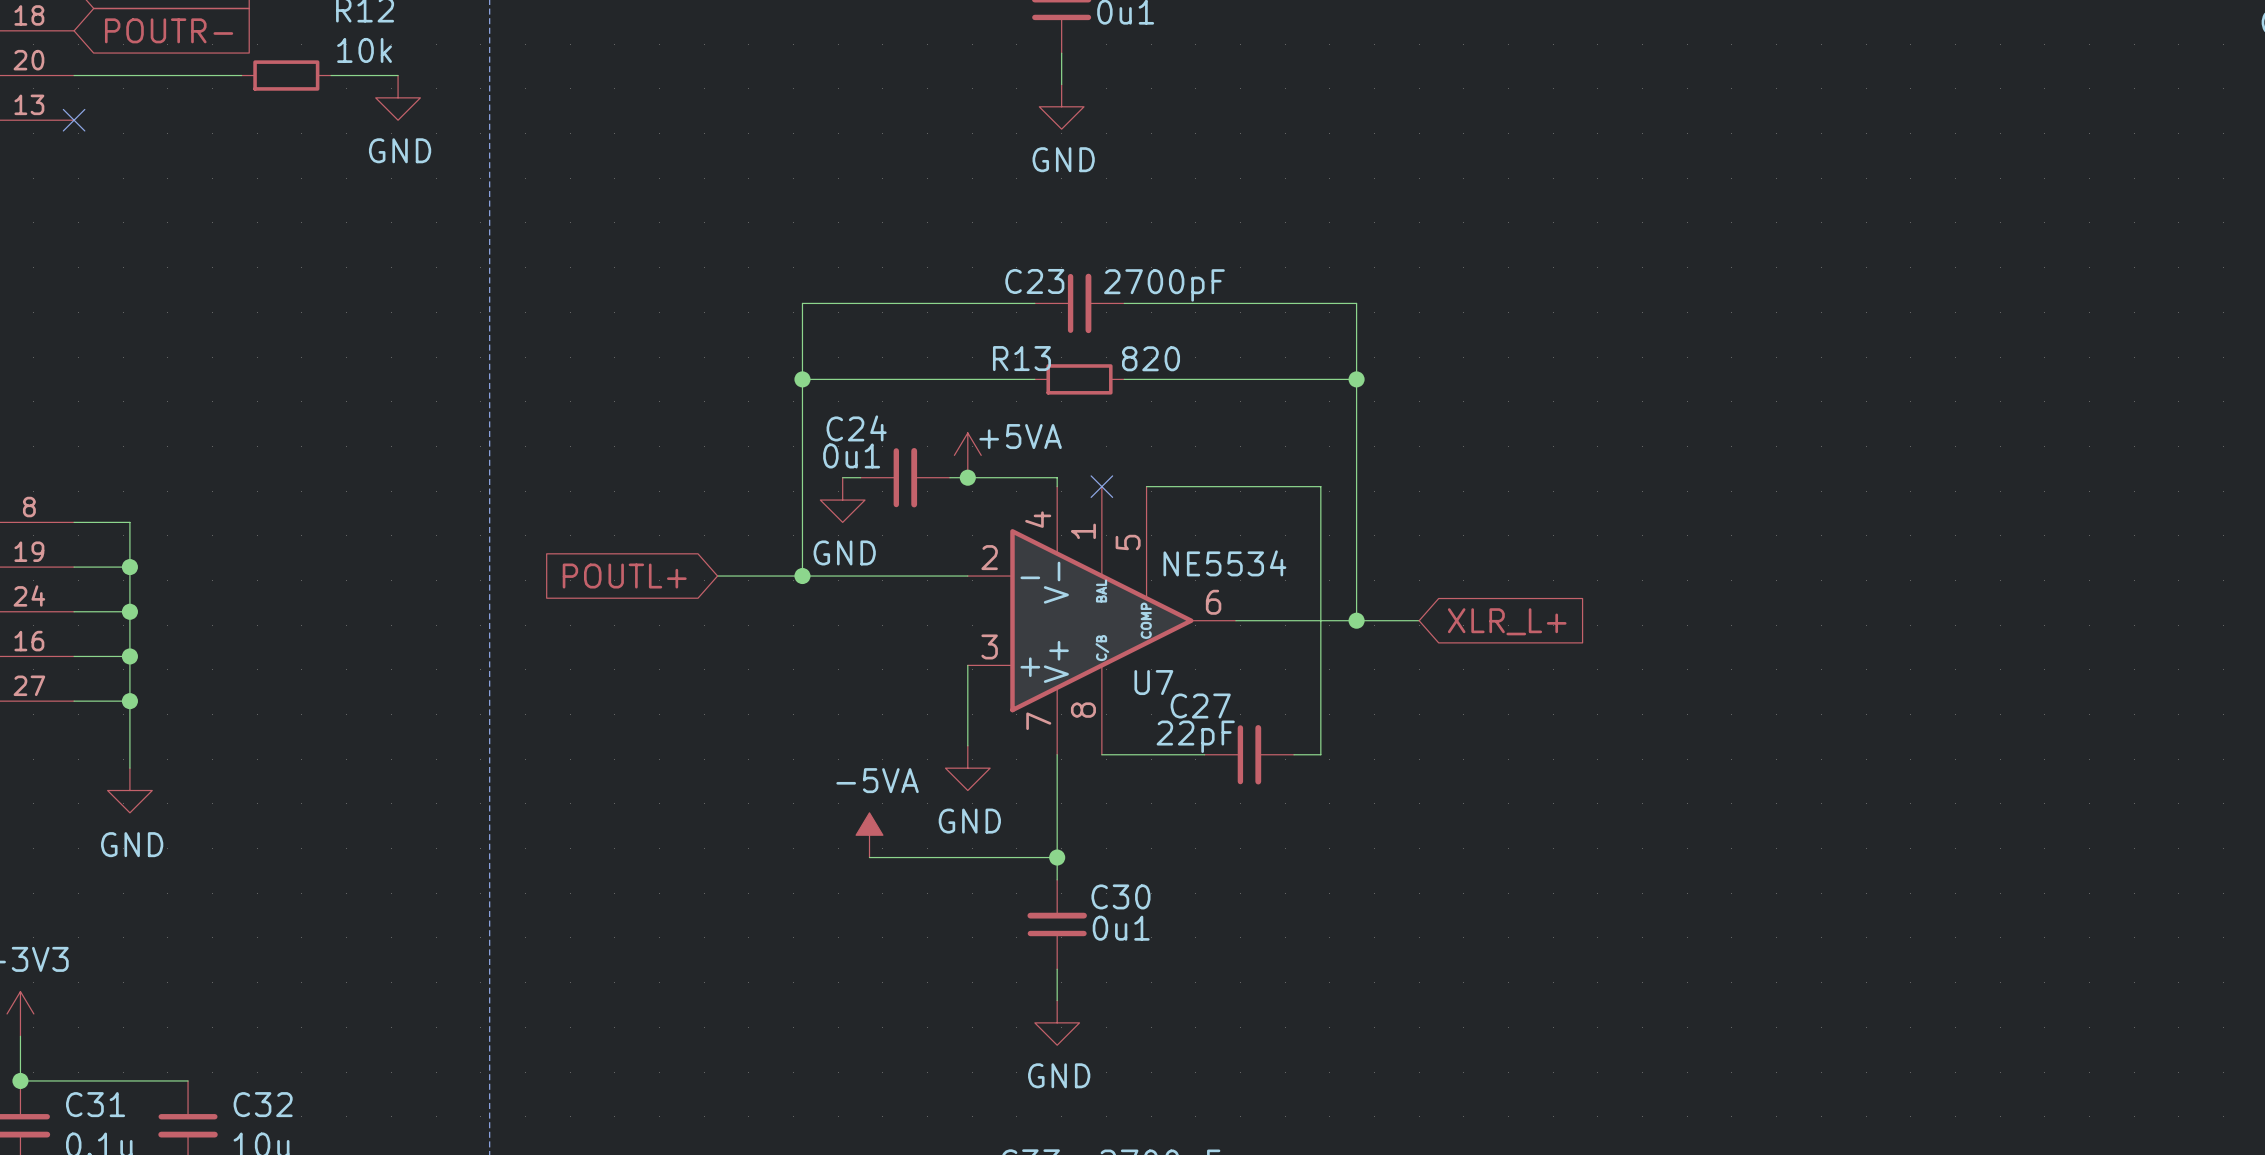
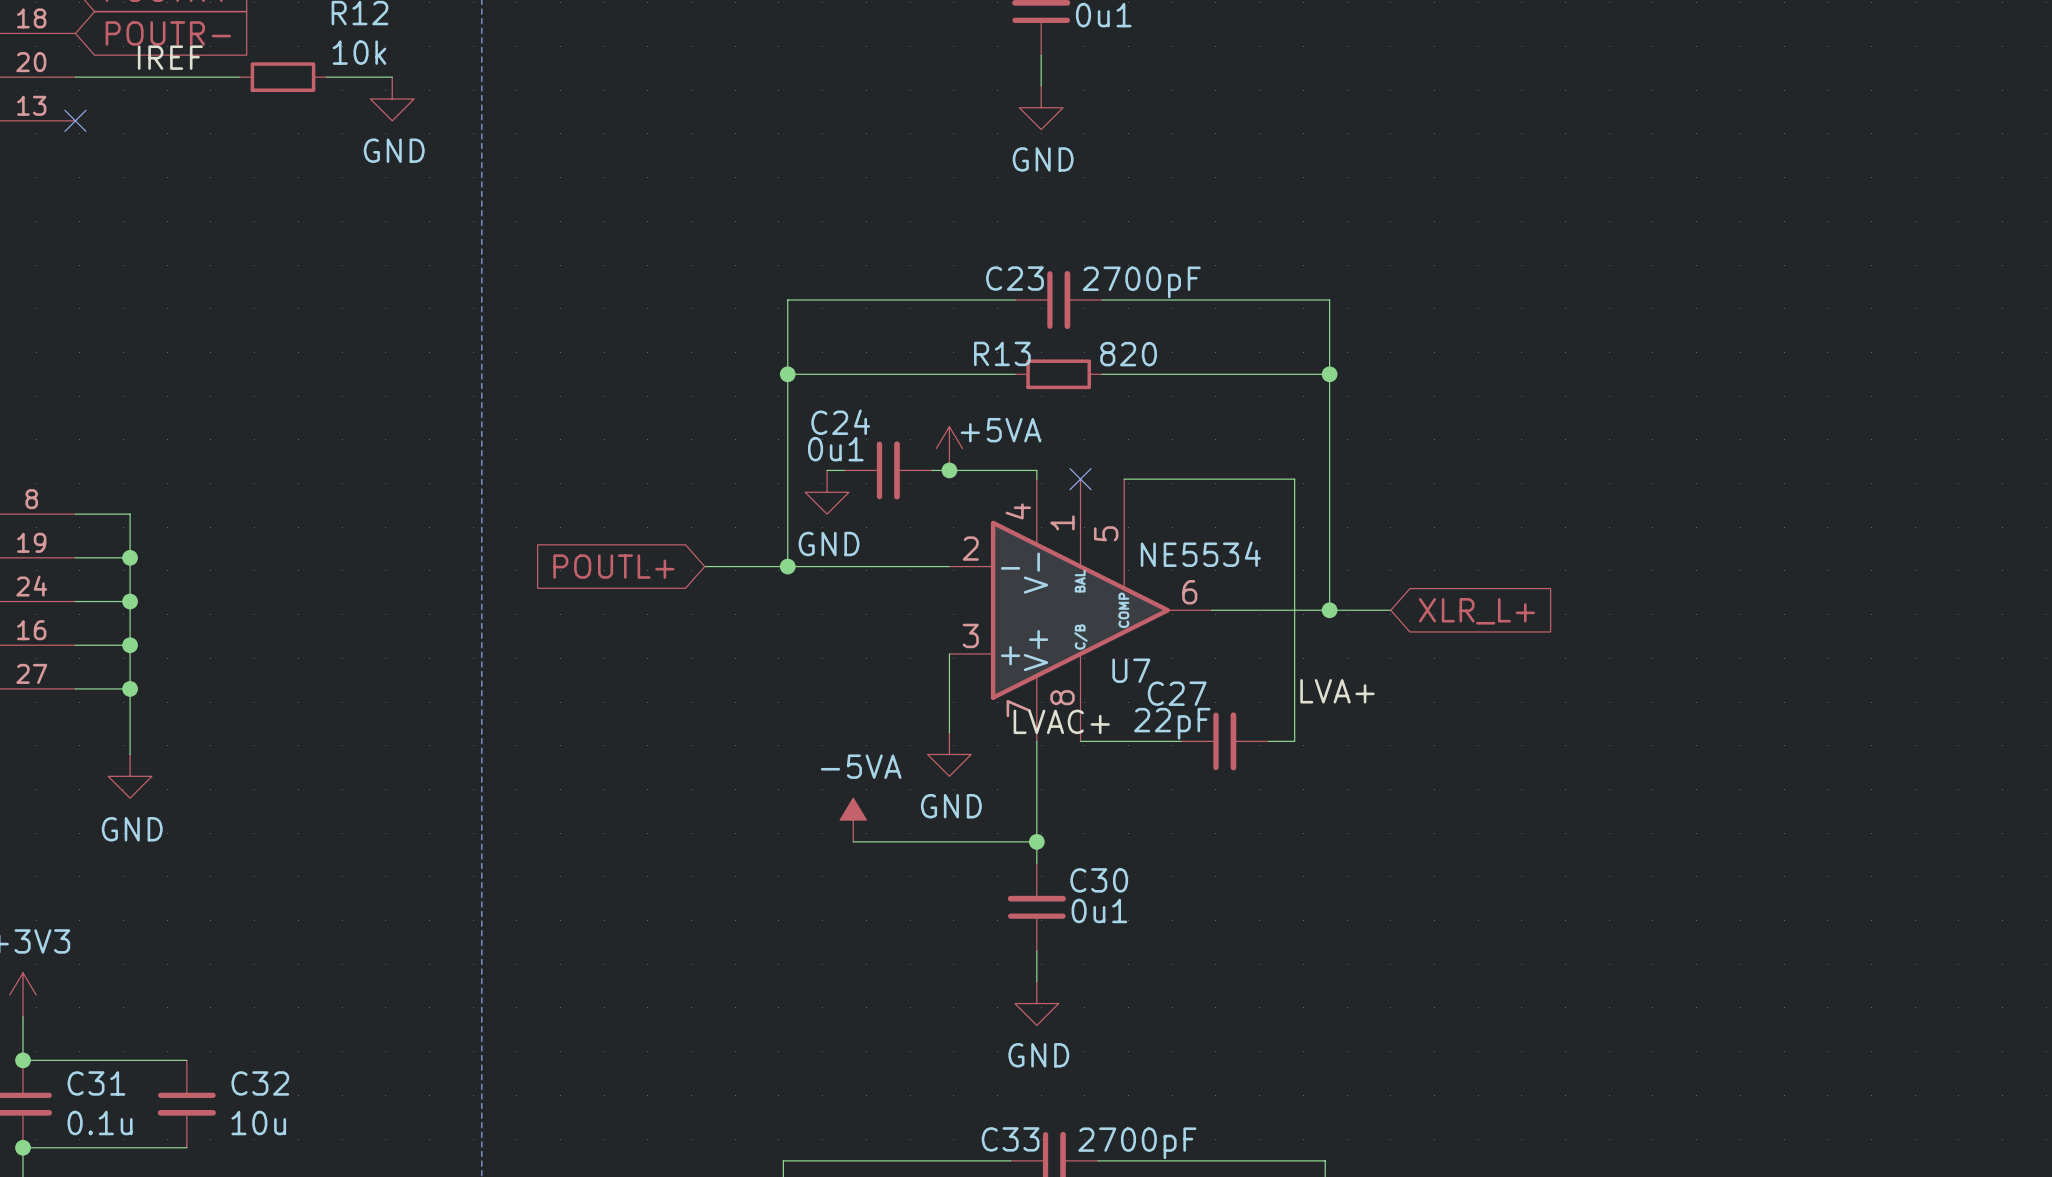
label: none -> IREF (170, 57)
label: none -> LVA+ (1337, 691)
label: none -> LVAC+ (1061, 721)

